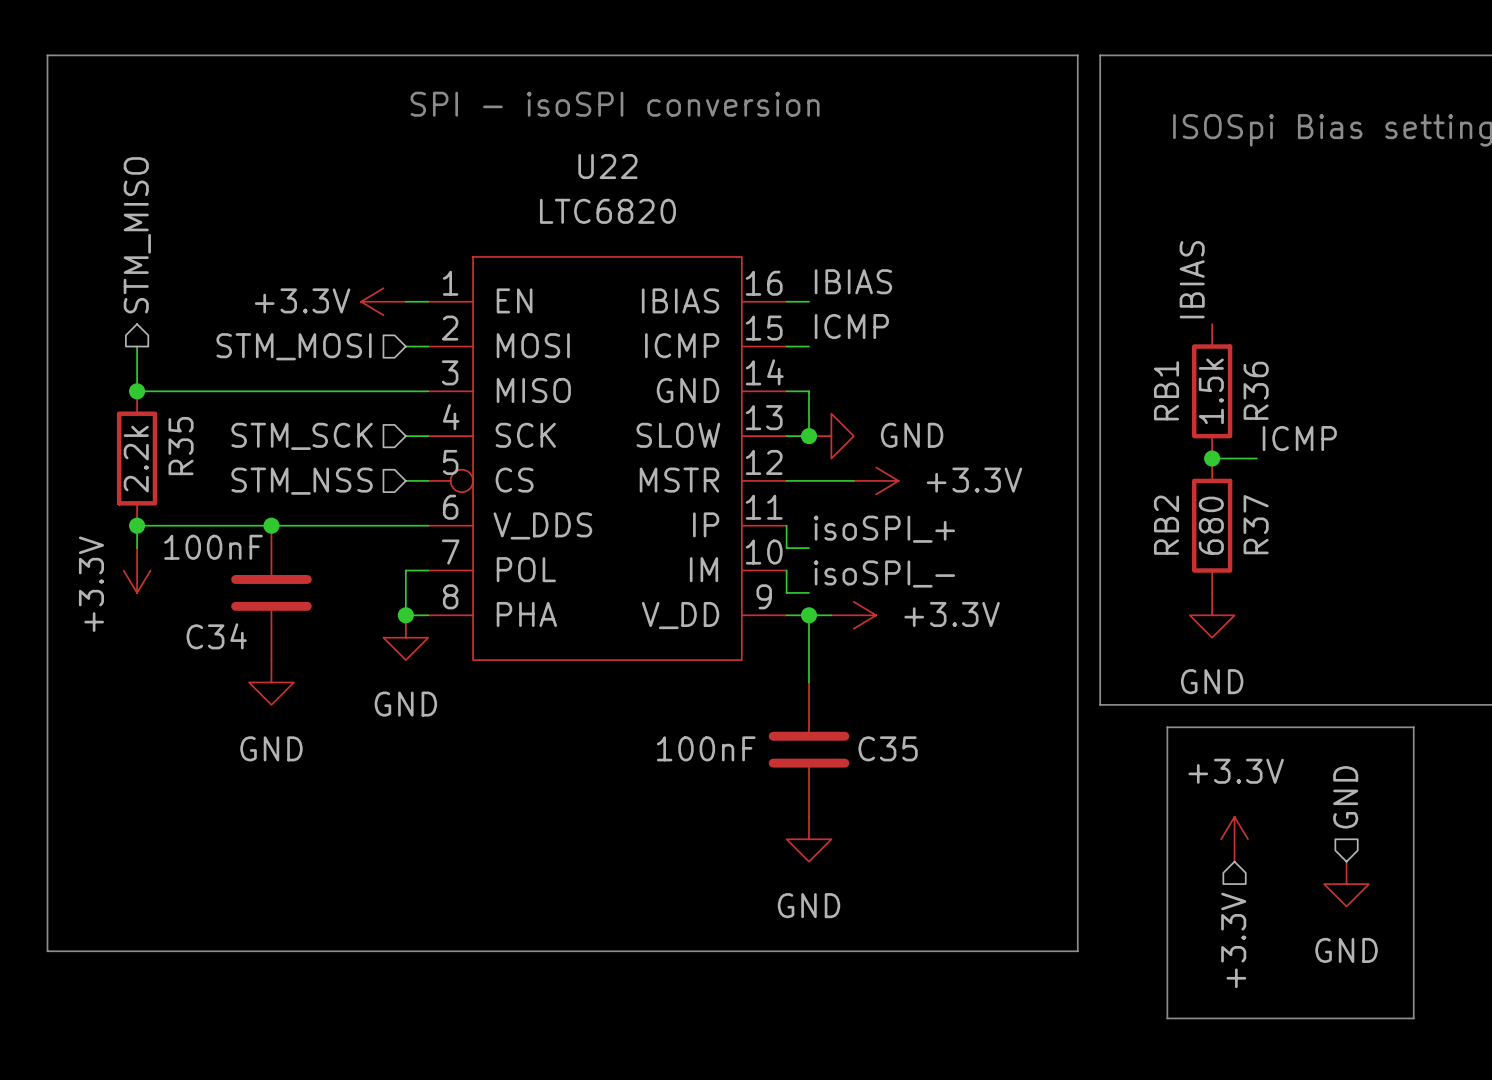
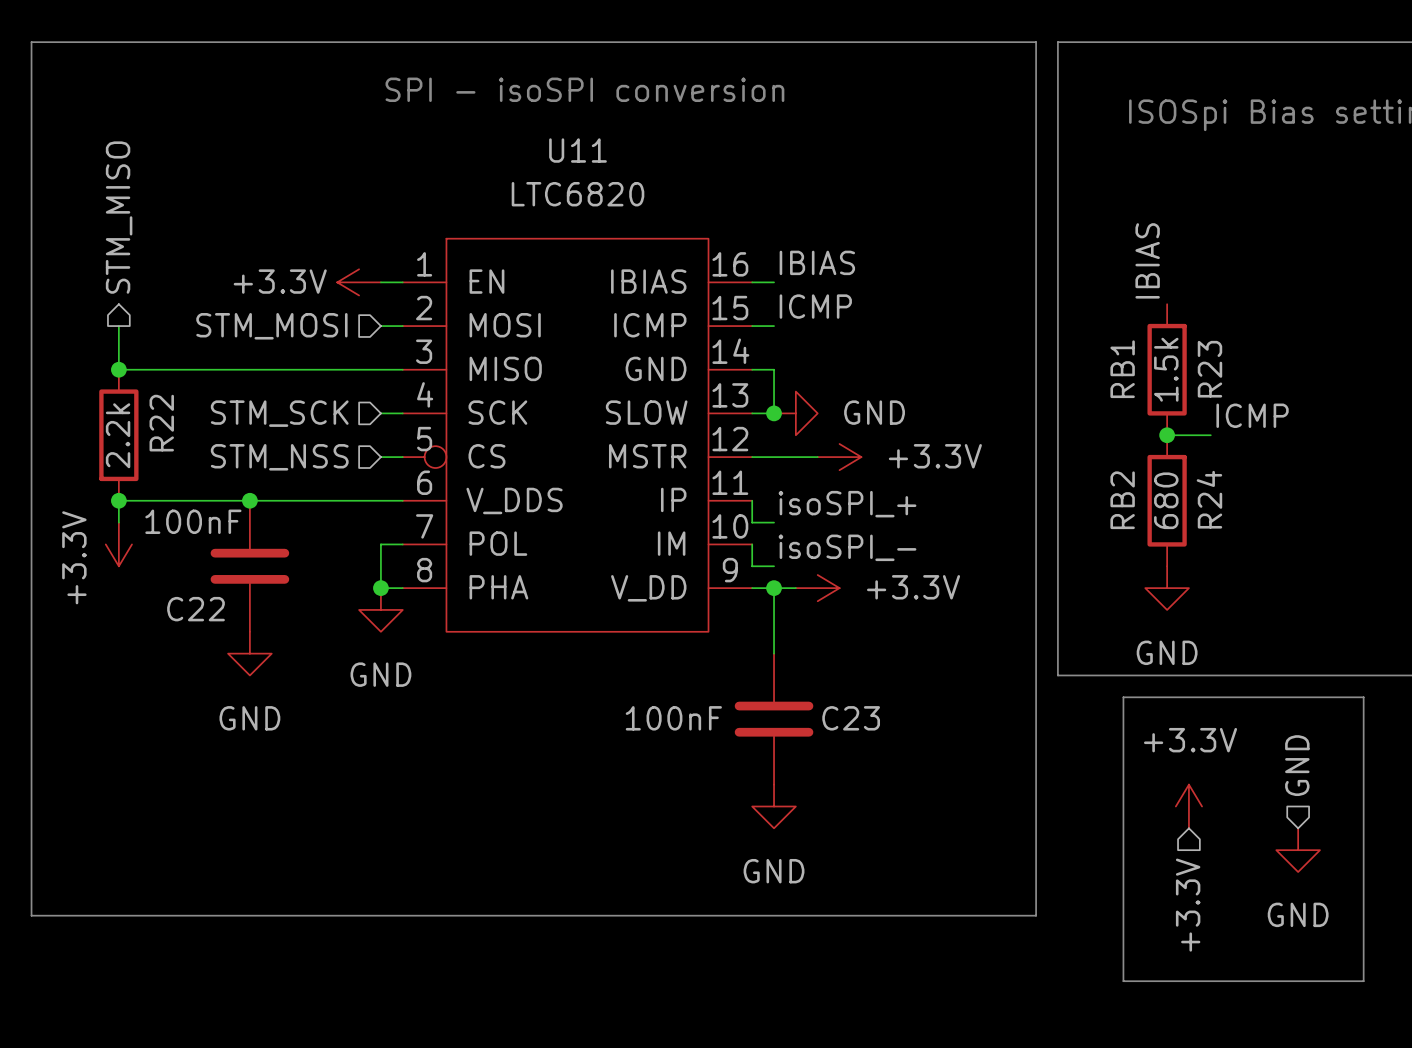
U22 name: U22 (607, 166) -> U11 (578, 150)
R36 name: R36 (1256, 390) -> R23 (1209, 369)
R35 name: R35 (181, 446) -> R22 (161, 423)
R37 name: R37 (1256, 524) -> R24 (1209, 499)
C34 name: C34 (216, 636) -> C22 (196, 609)
C35 name: C35 (888, 748) -> C23 (851, 718)

